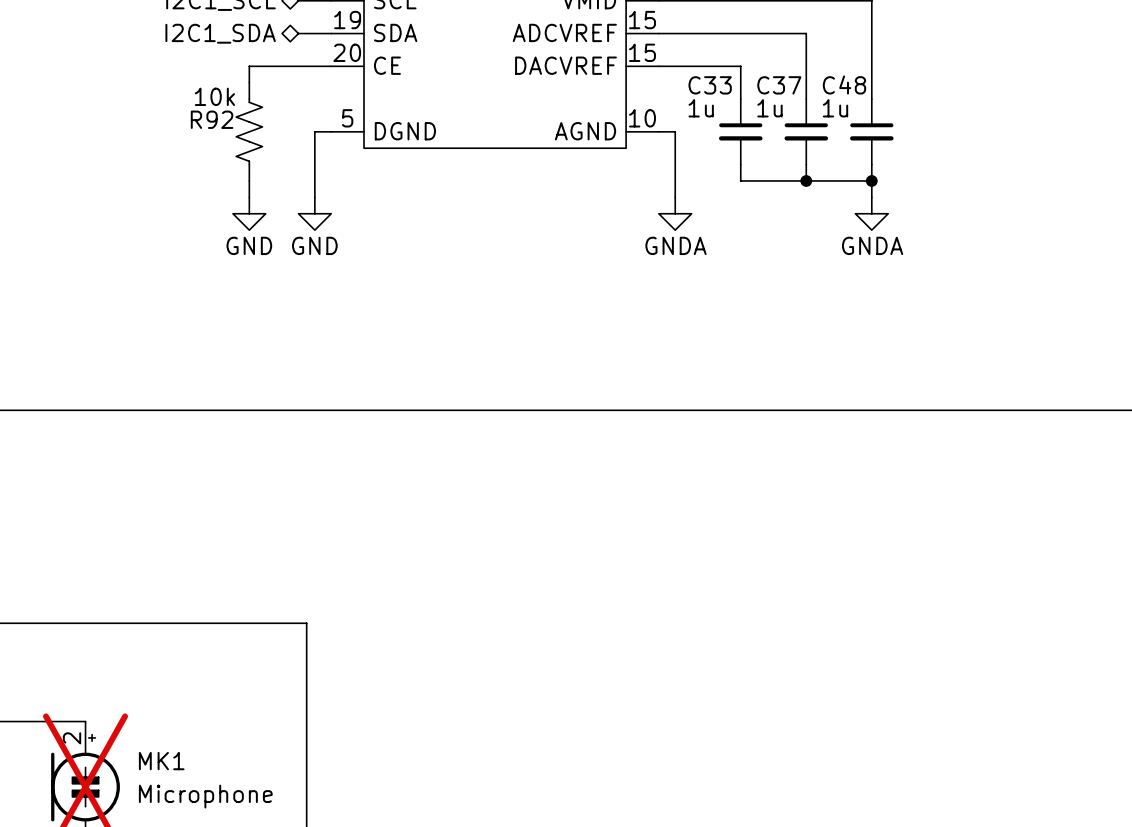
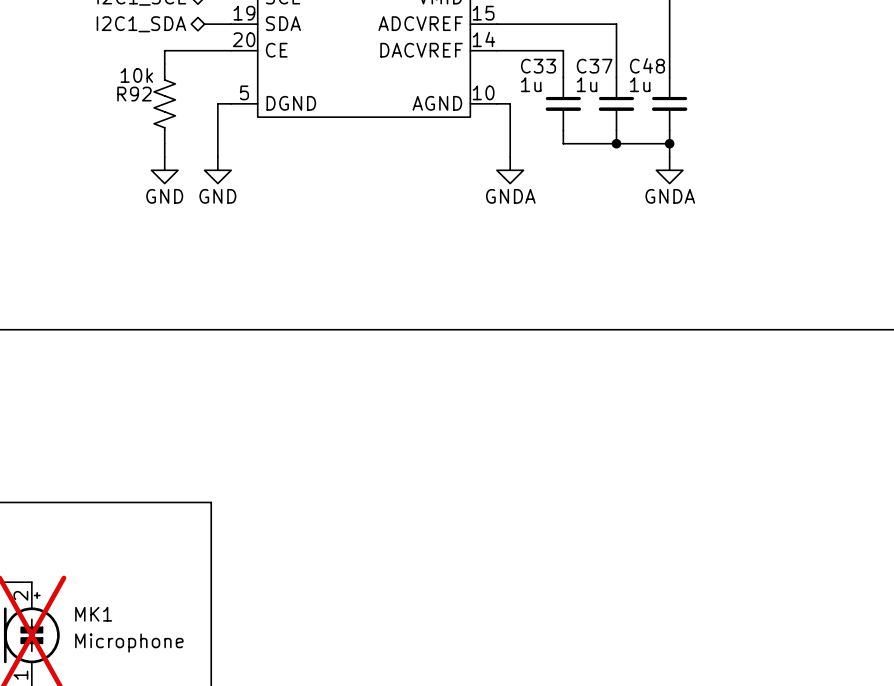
part pin number: 15 (642, 52) -> 14 (483, 39)

